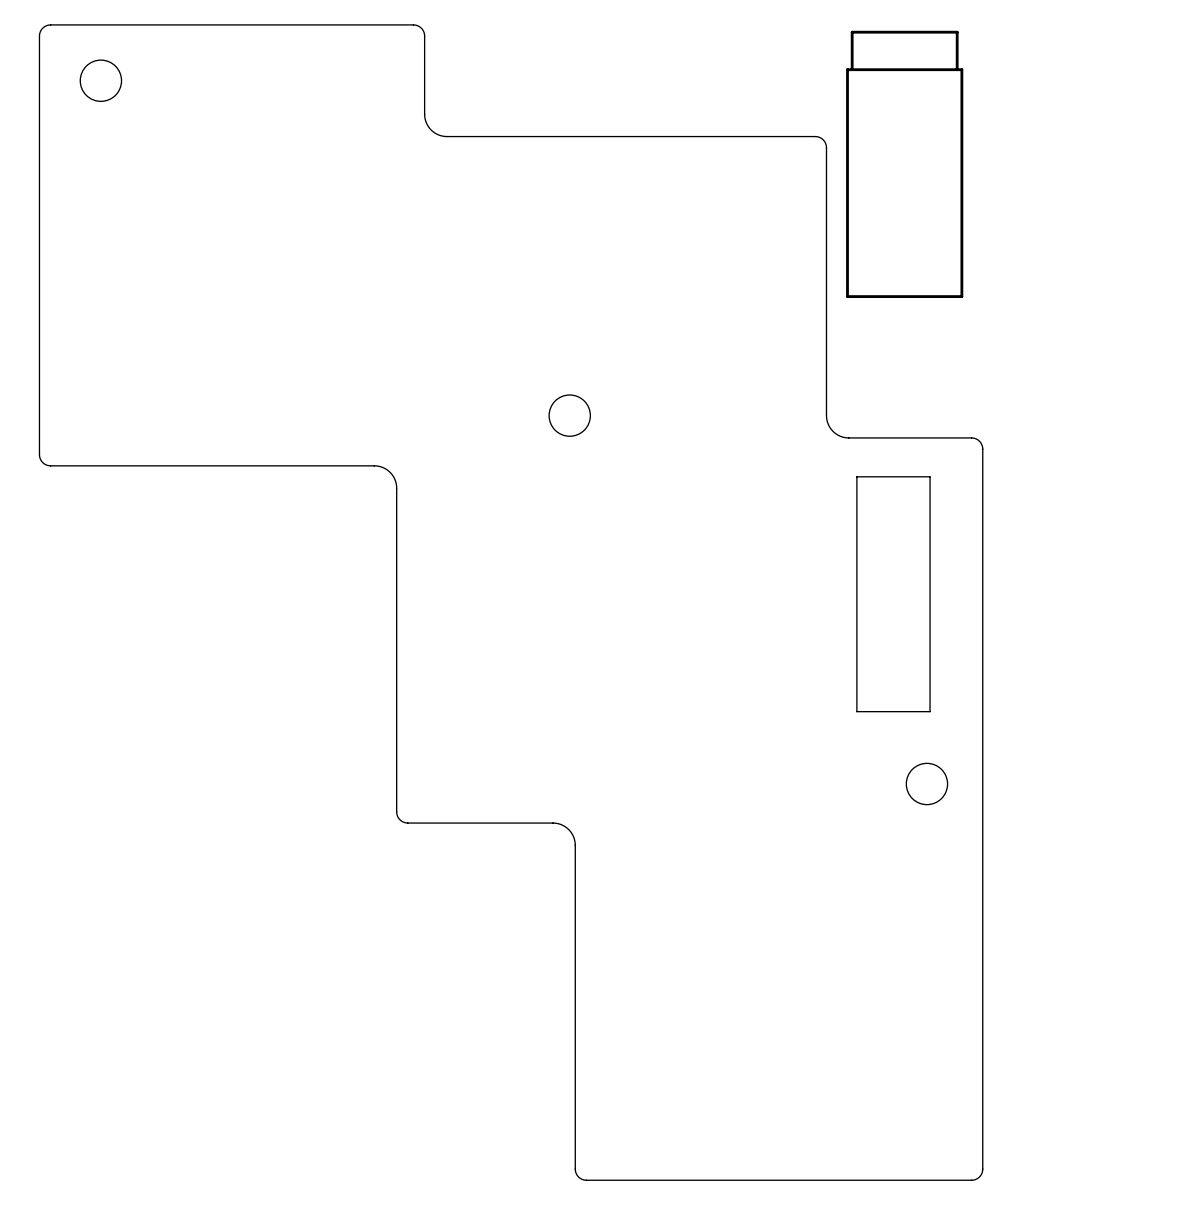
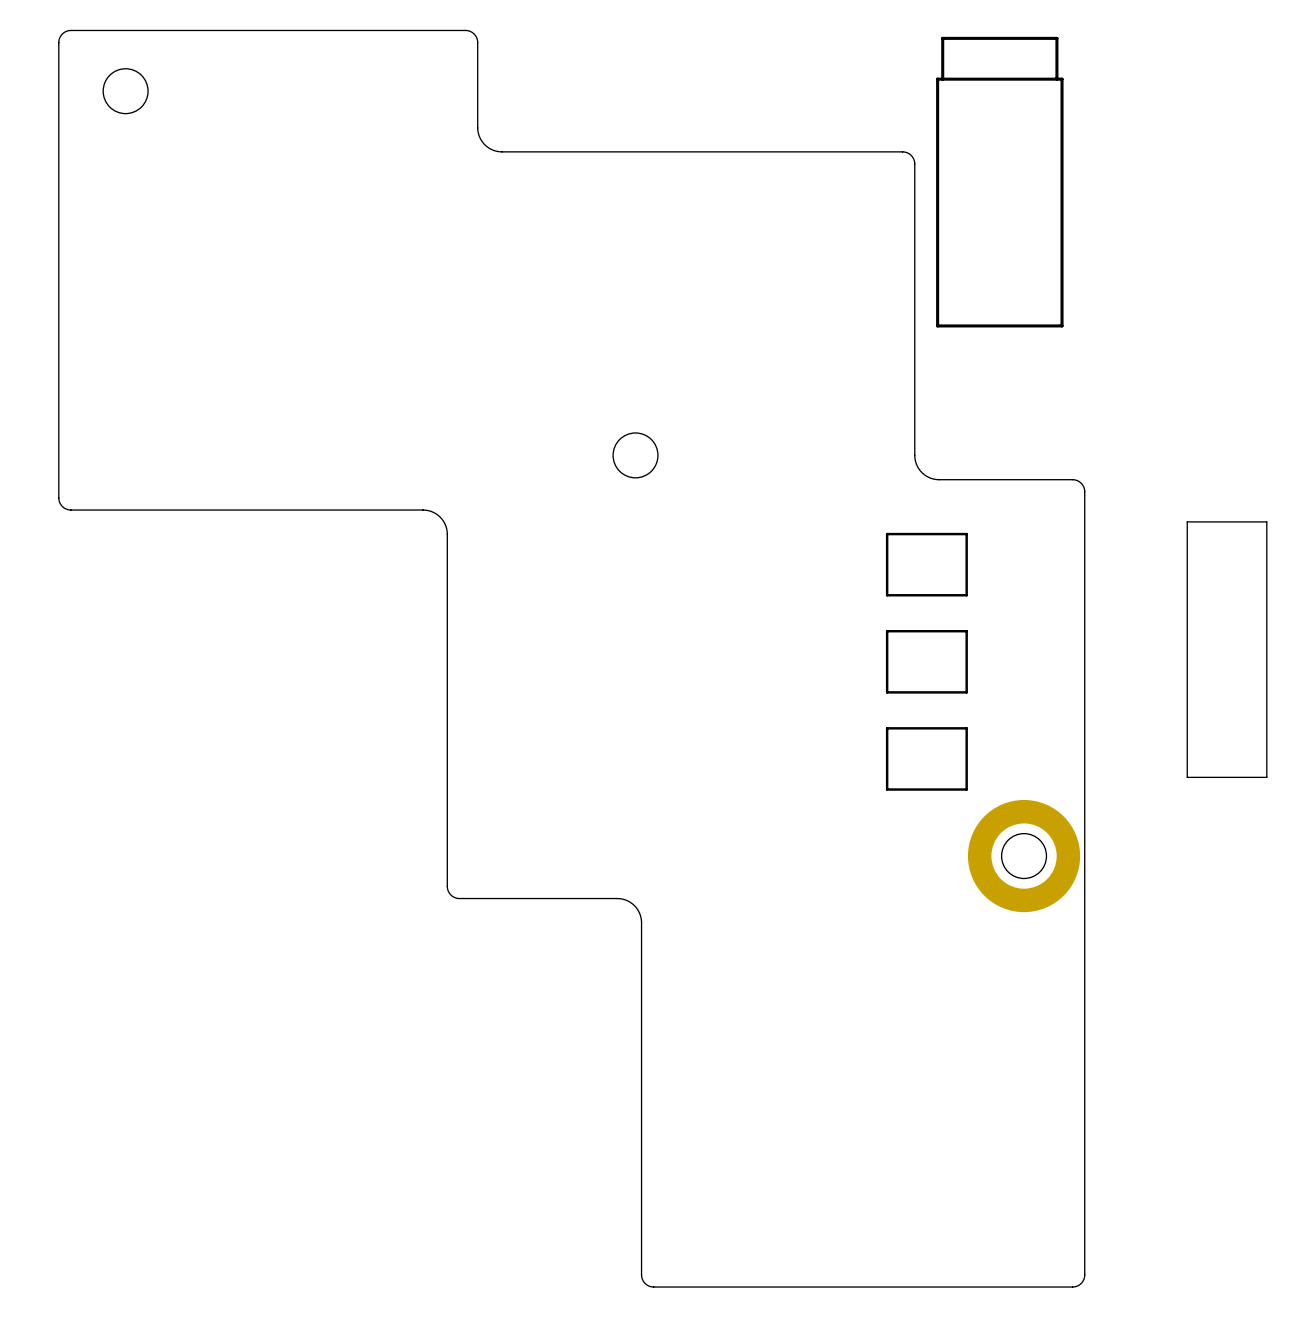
board edge: (856, 476) (930, 476) (930, 711) (856, 711) (856, 476) -> (1187, 521) (1266, 521) (1266, 777) (1187, 777) (1187, 521)
part: none -> (926, 564)
part: none -> (926, 661)
part: none -> (926, 758)
part: none -> (1024, 856)

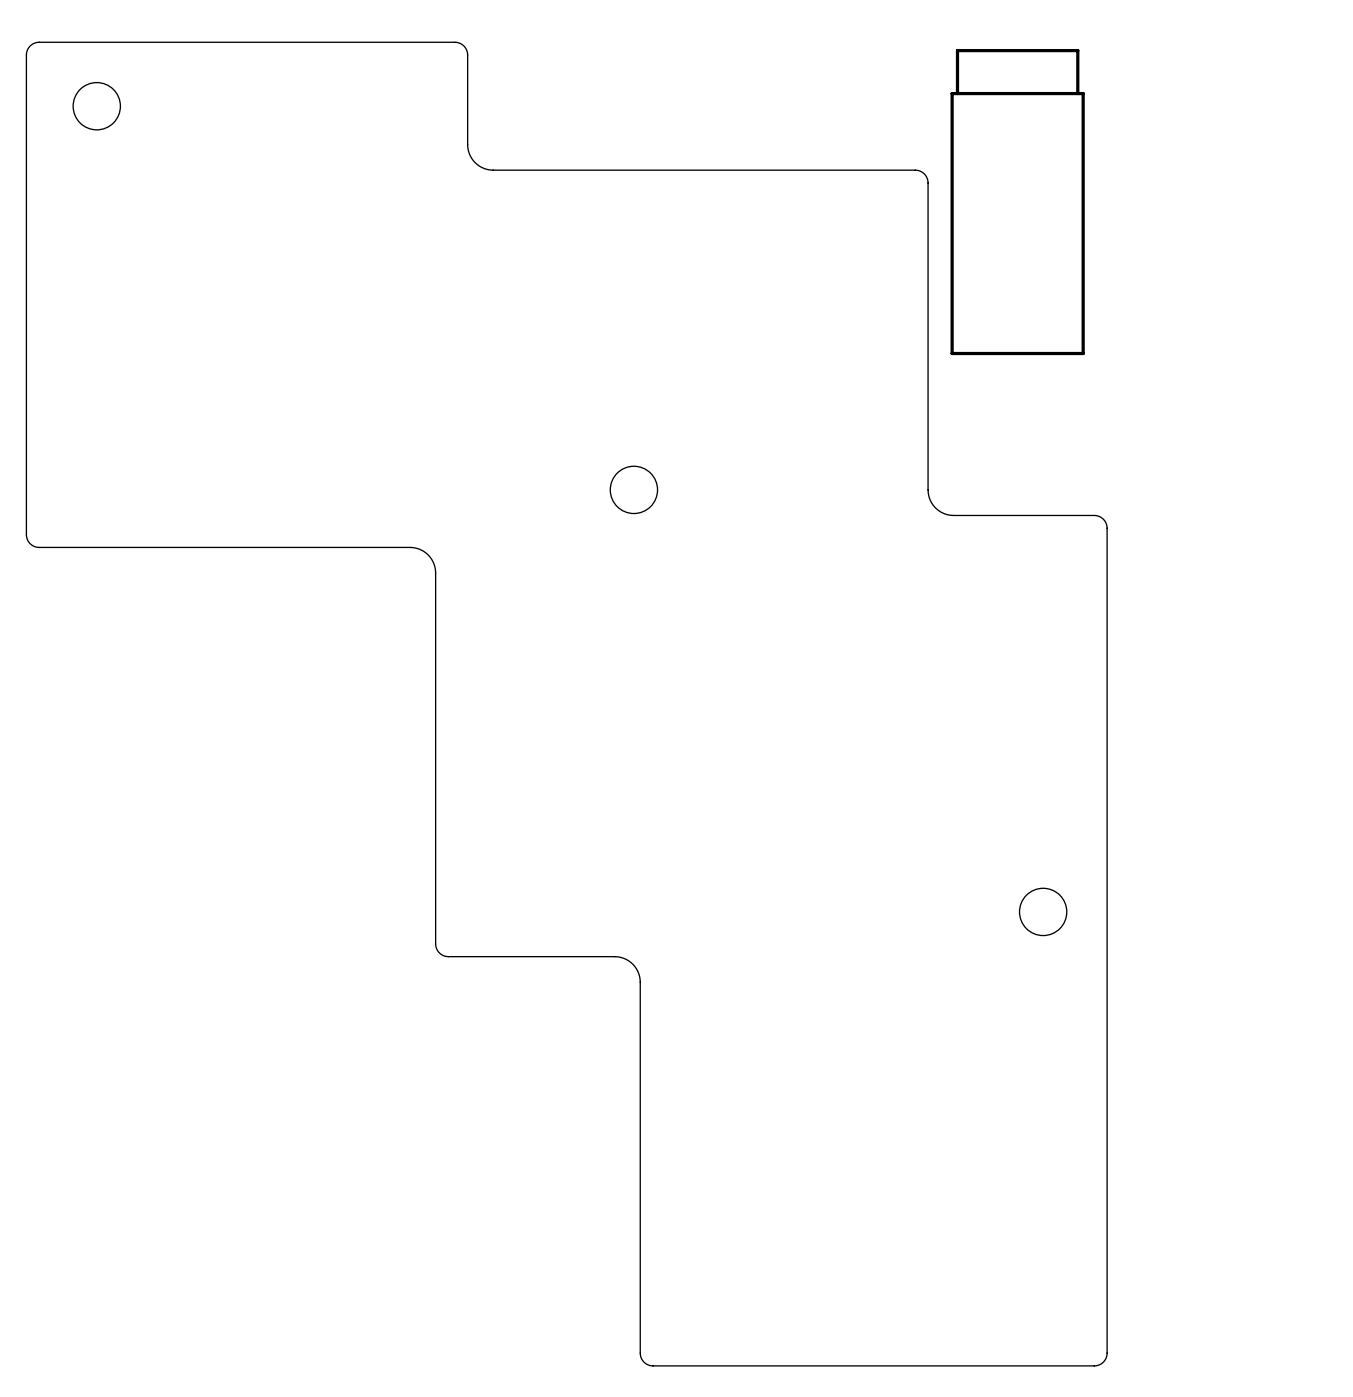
board edge: (1187, 521) (1266, 521) (1266, 777) (1187, 777) (1187, 521) -> none
part: (926, 564) -> none
part: (926, 661) -> none
part: (926, 758) -> none
part: (1024, 856) -> none

